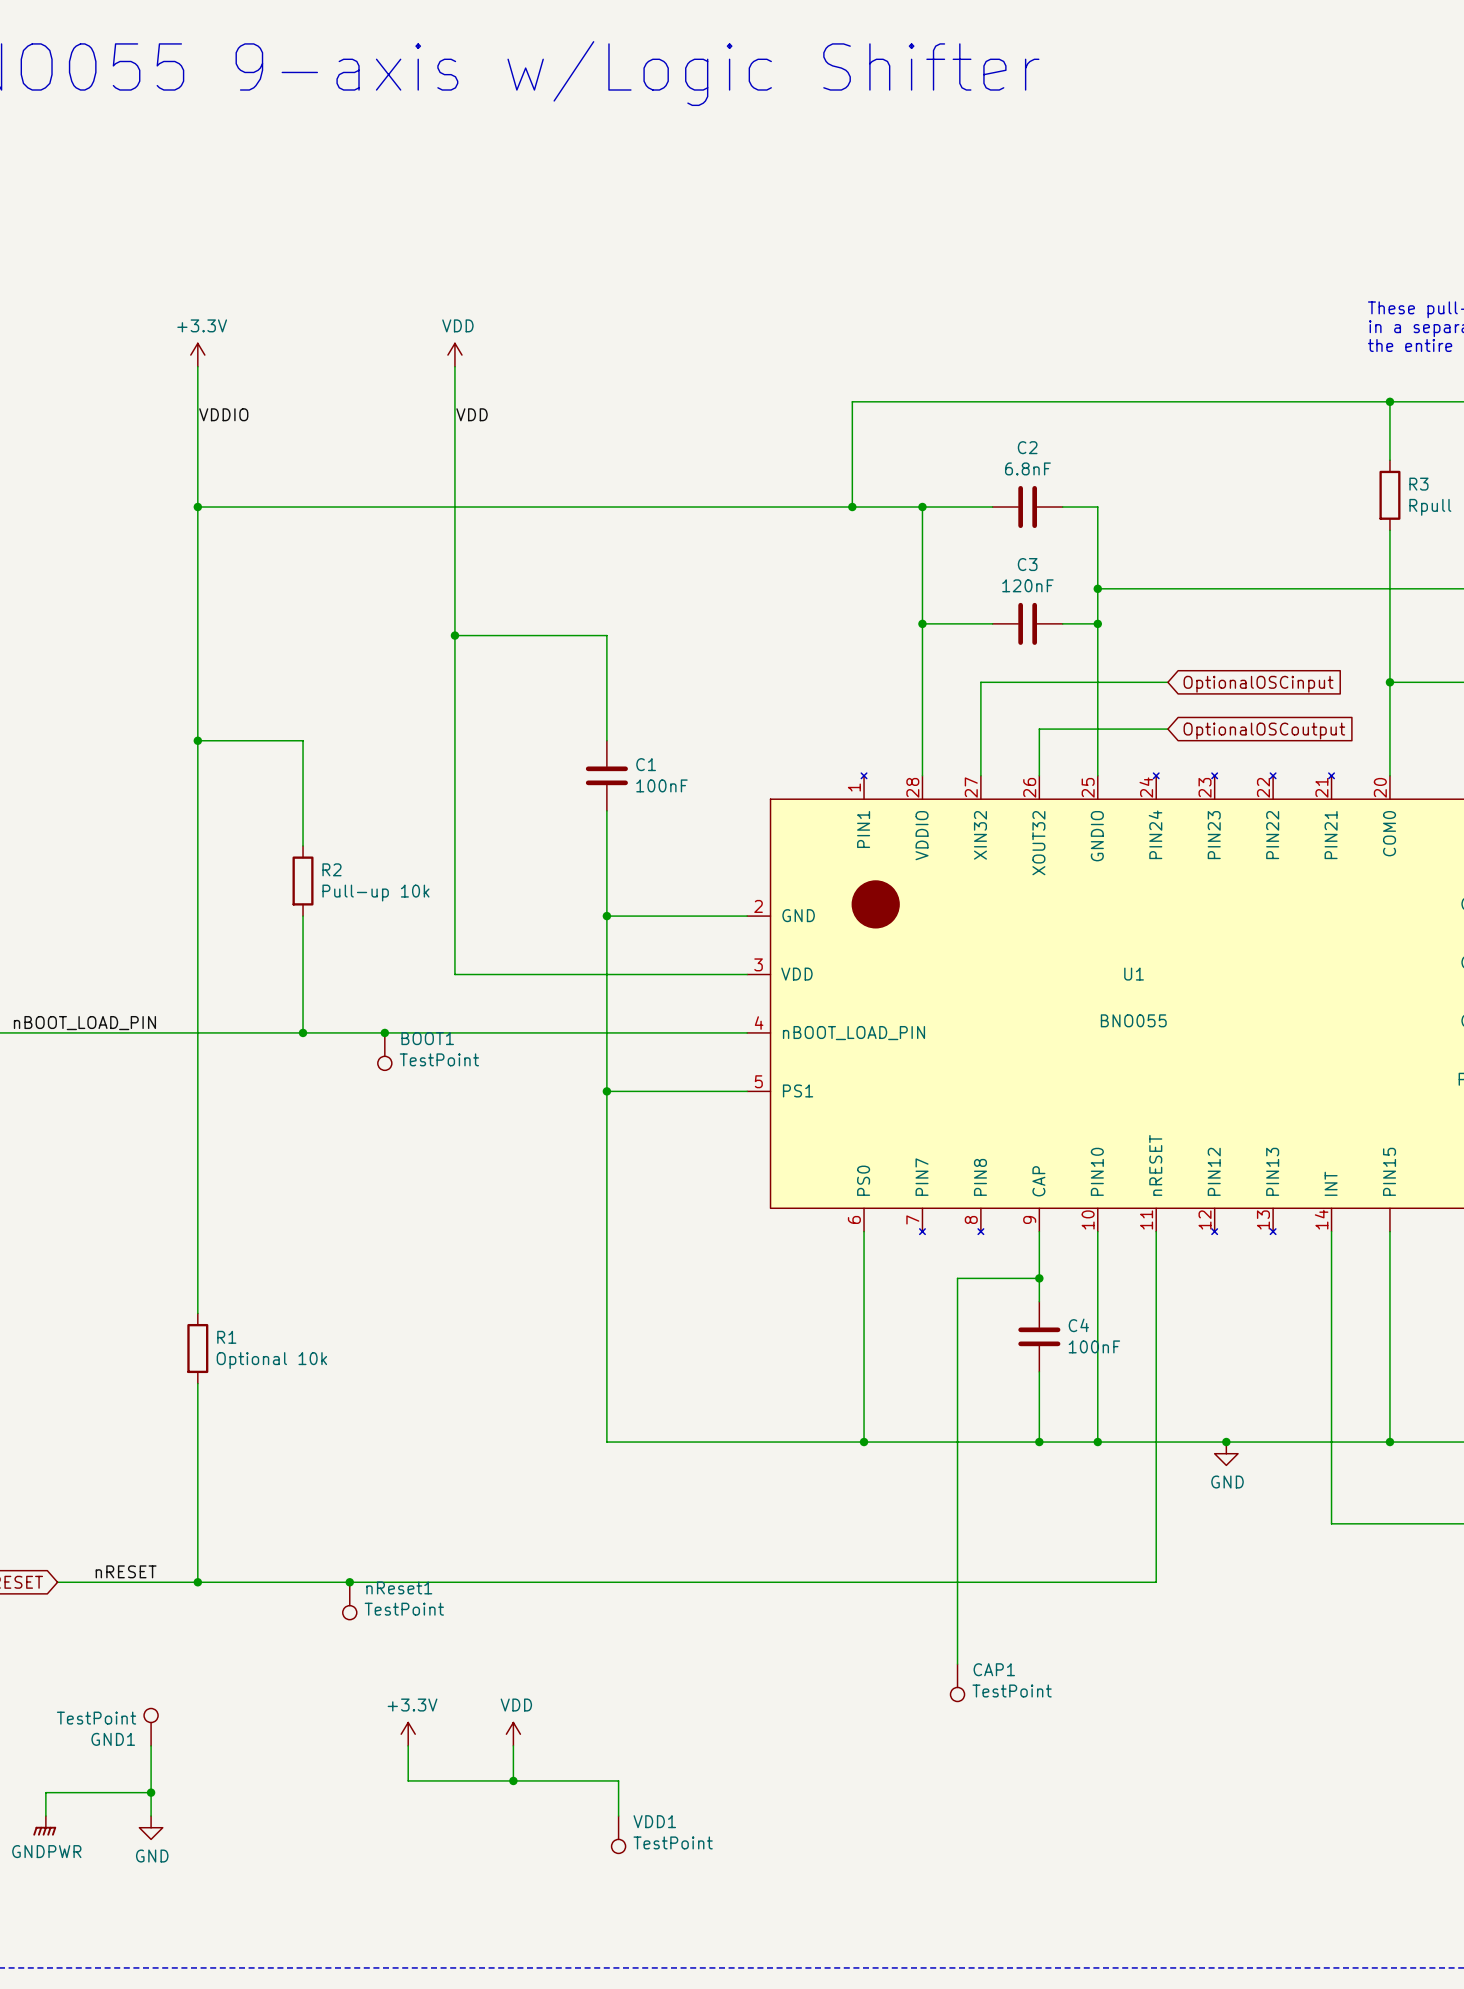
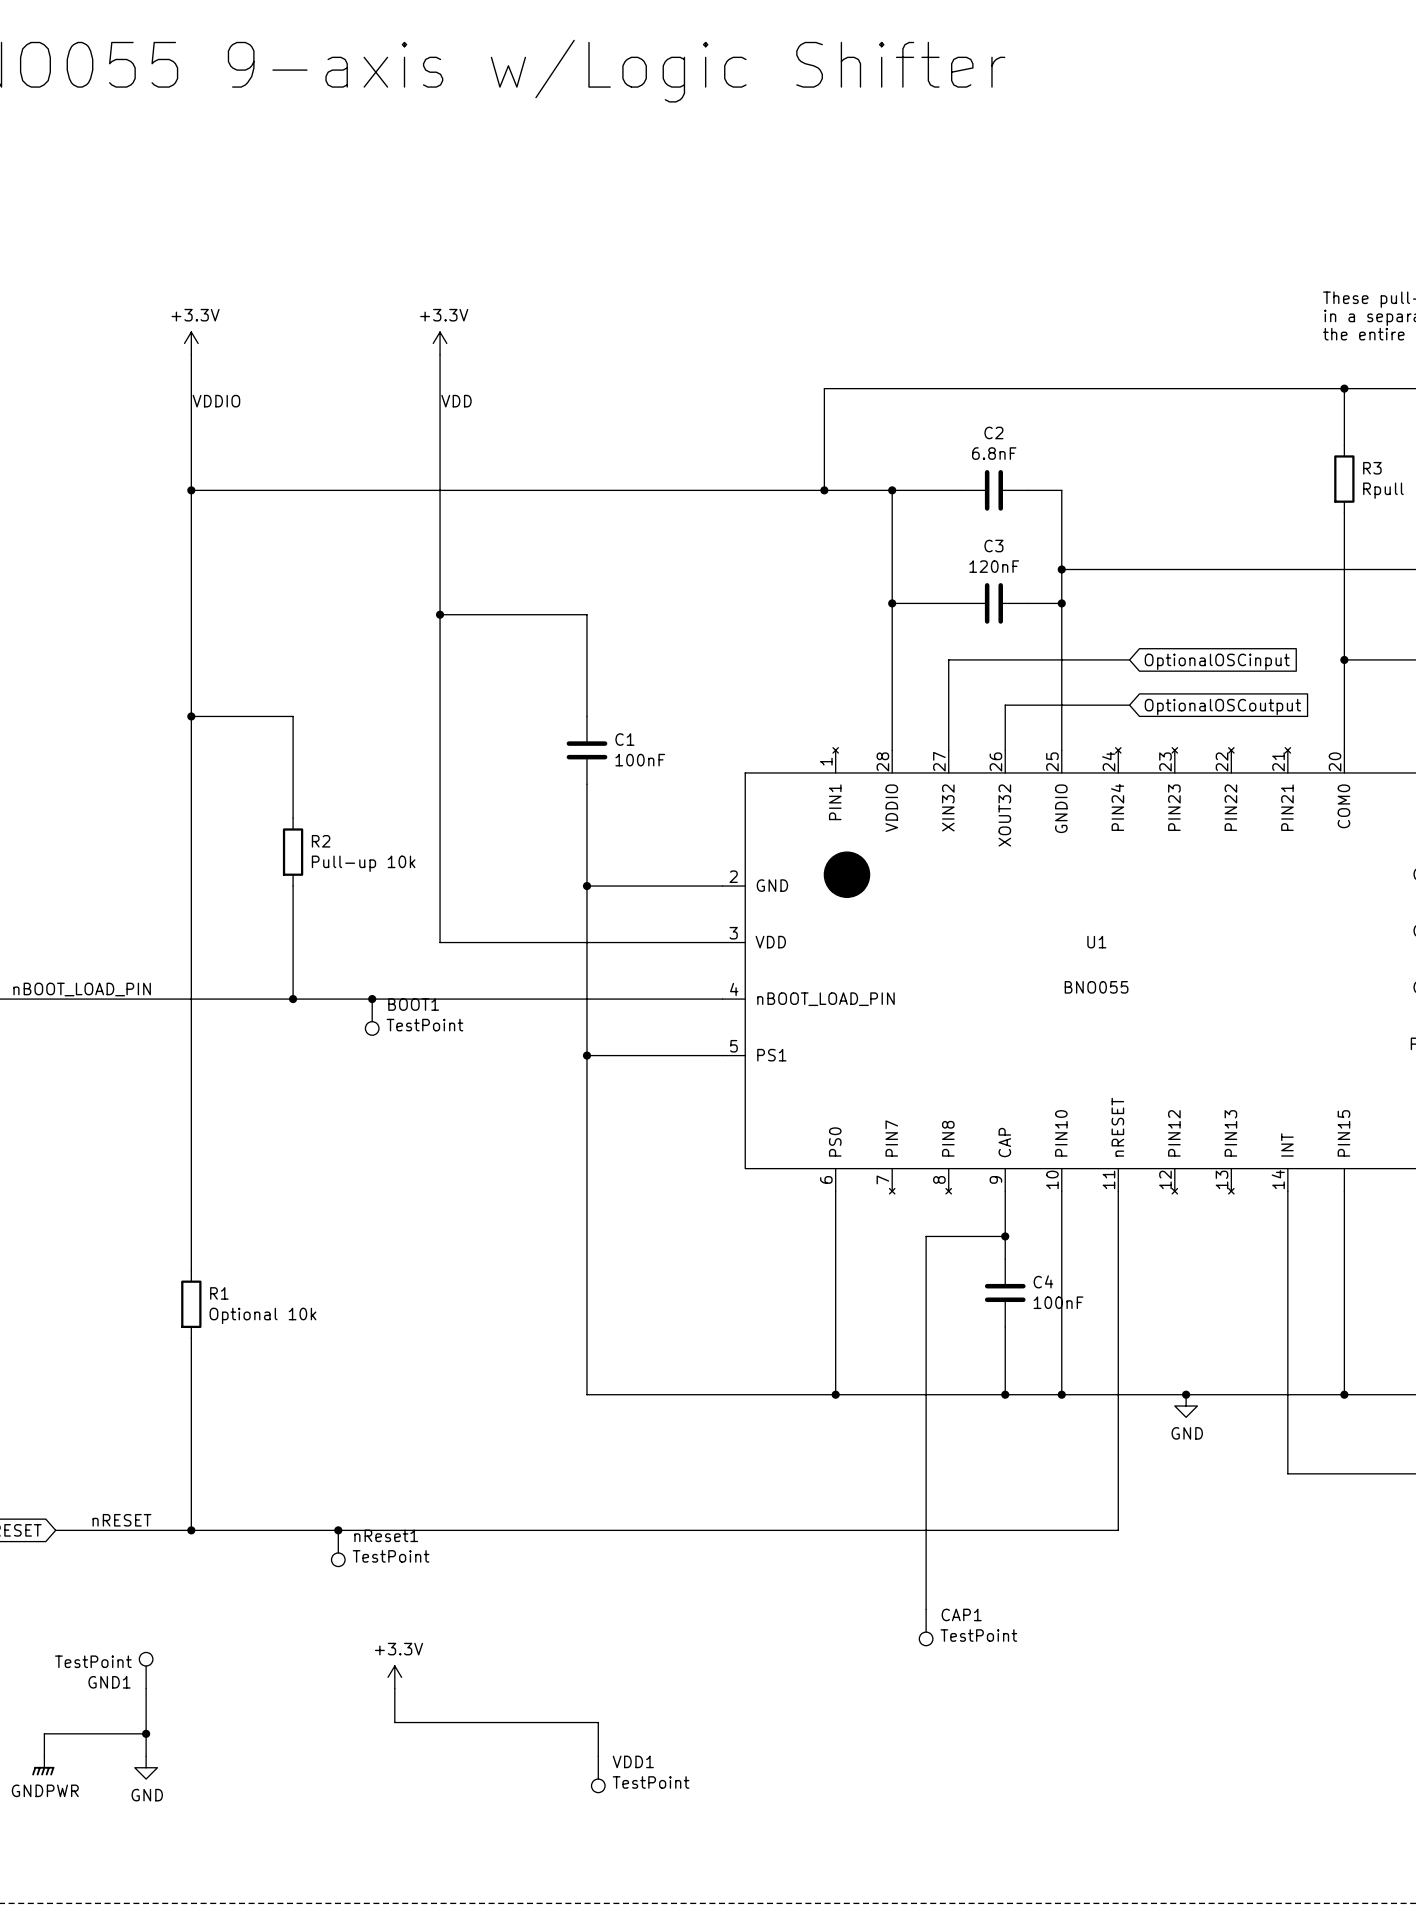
power symbol: VDD (454, 355) -> +3.3V (440, 343)
power symbol: VDD (513, 1734) -> none
wire: (513, 1745) (513, 1780) -> none
junction: (513, 1780) -> none

